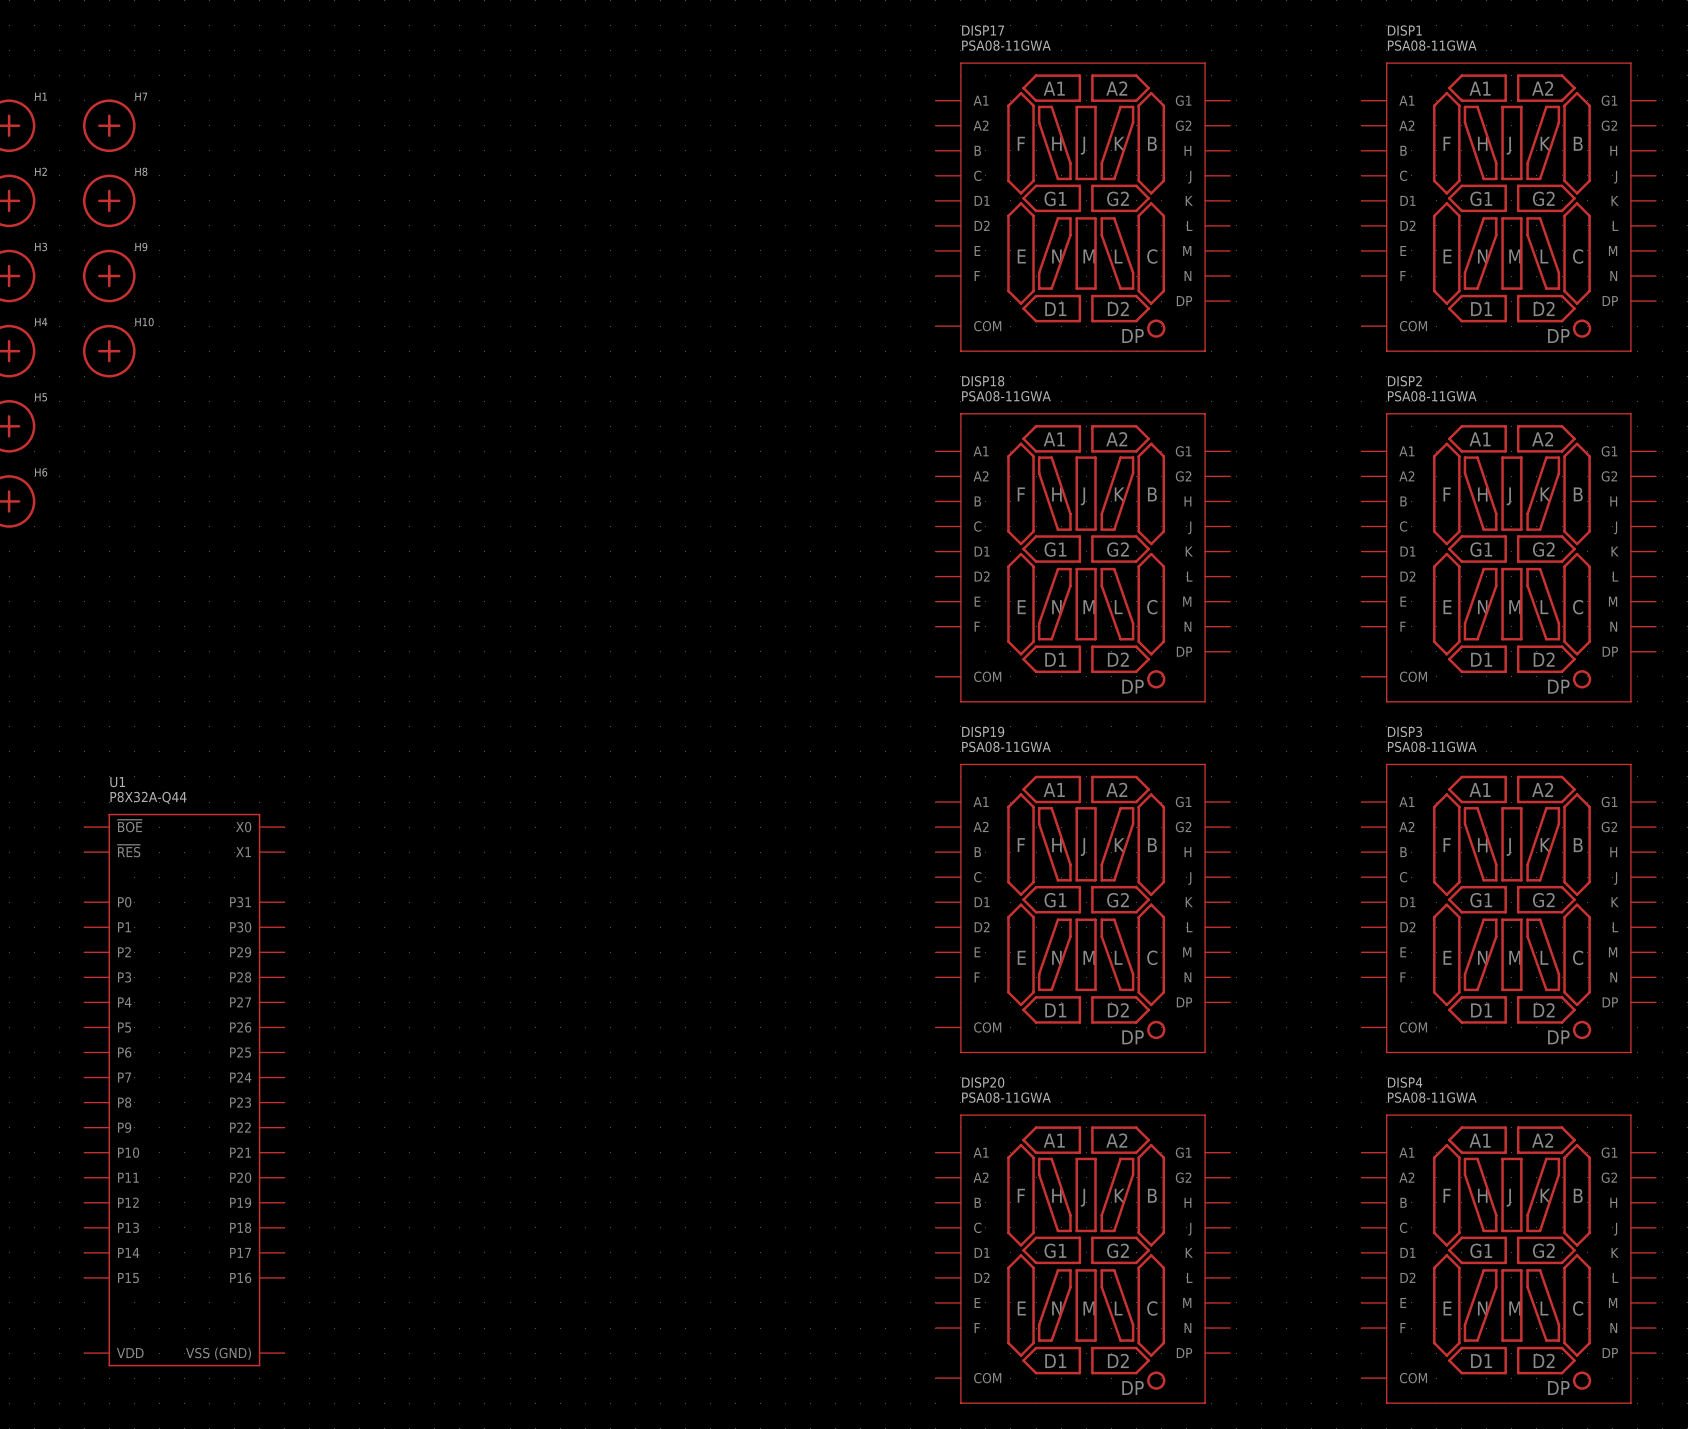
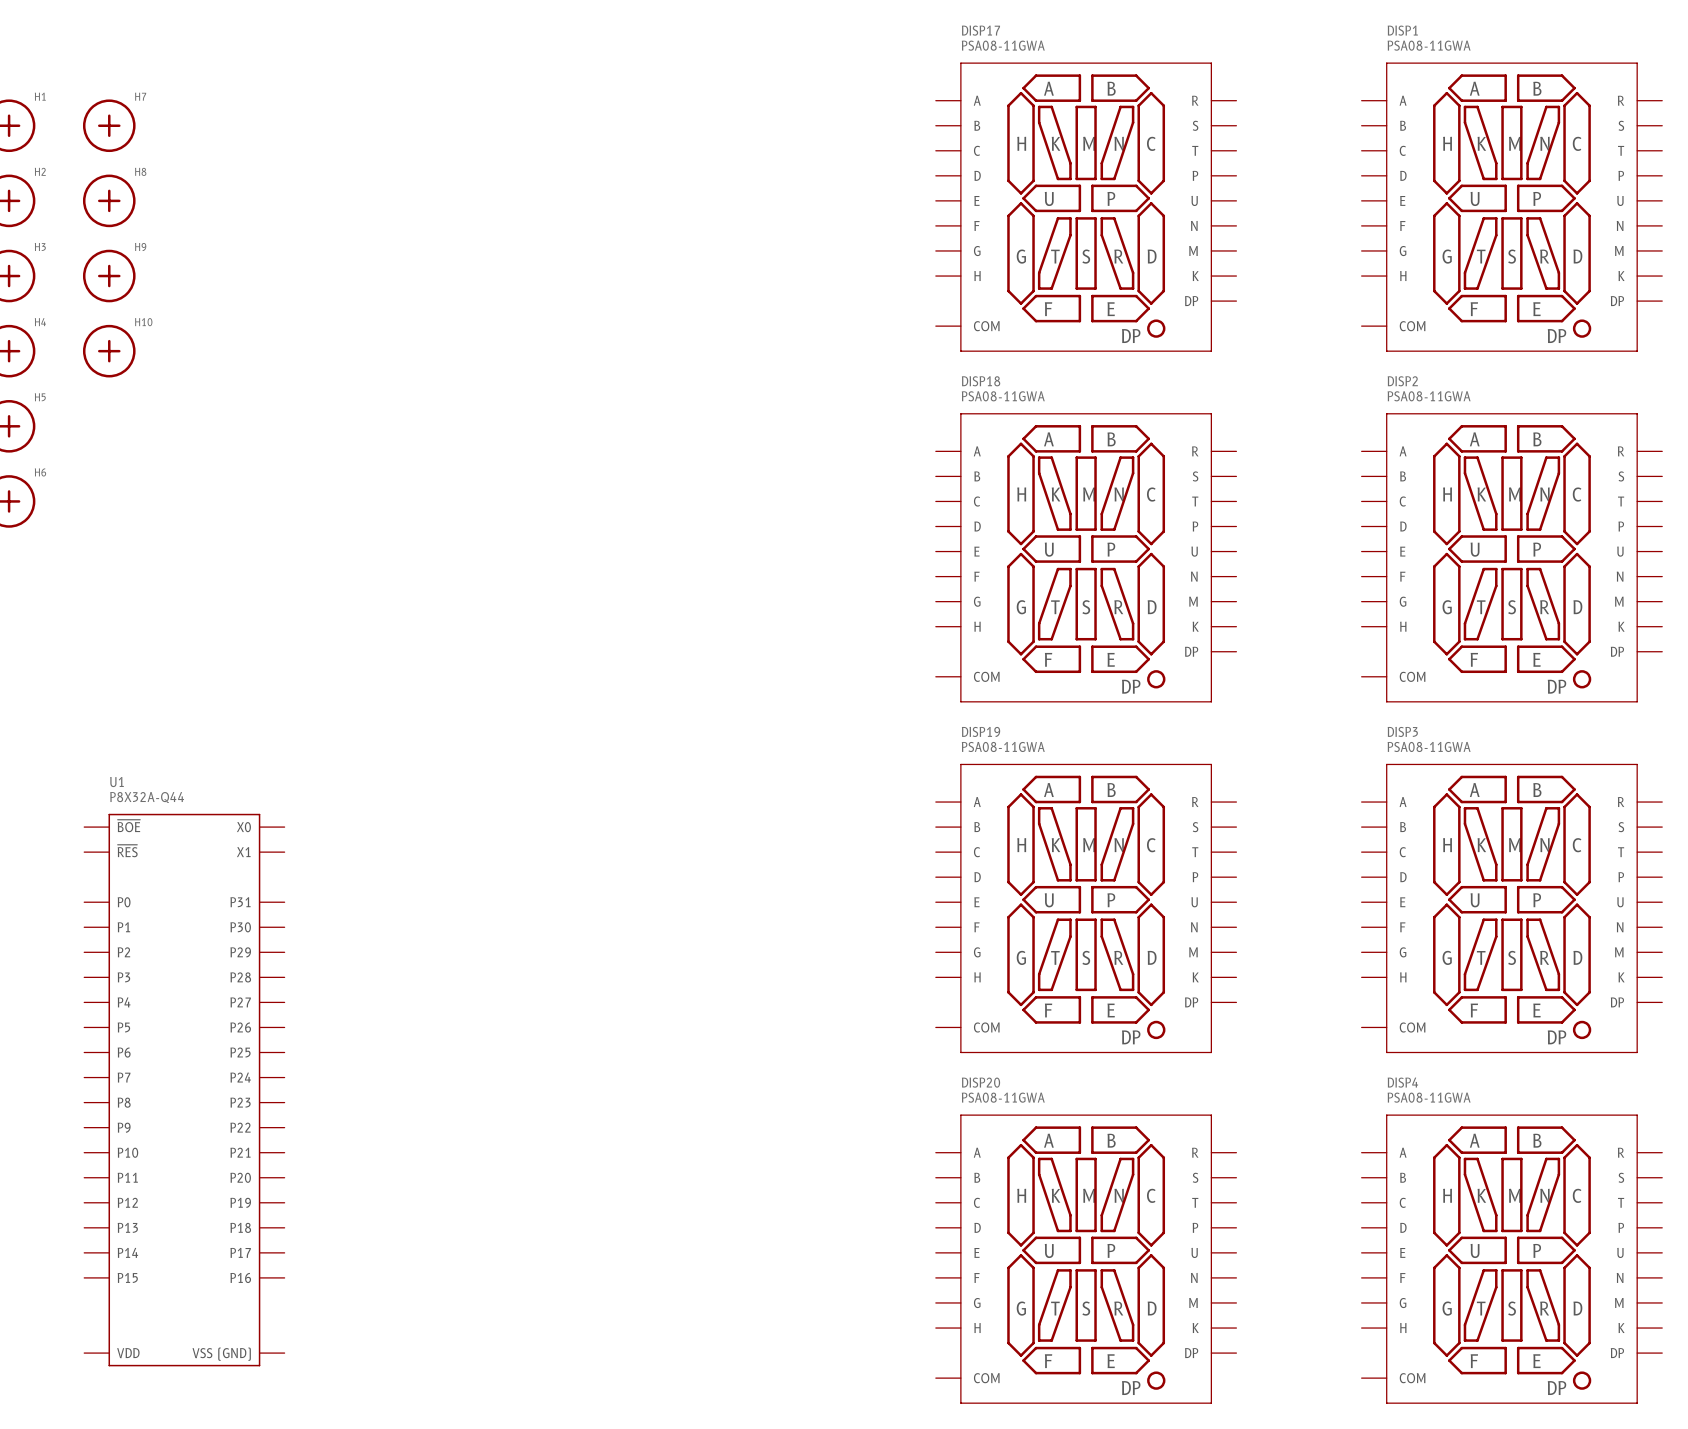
DISP17 symbol: [935, 62, 1231, 352] -> [935, 62, 1237, 352]
DISP1 symbol: [1361, 62, 1656, 352] -> [1361, 62, 1663, 352]
DISP18 symbol: [935, 413, 1231, 703] -> [935, 413, 1237, 703]
DISP2 symbol: [1361, 413, 1656, 703] -> [1361, 413, 1663, 703]
DISP19 symbol: [935, 763, 1231, 1054] -> [935, 763, 1237, 1054]
DISP3 symbol: [1361, 763, 1656, 1054] -> [1361, 763, 1663, 1054]
DISP20 symbol: [935, 1114, 1231, 1404] -> [935, 1114, 1237, 1404]
DISP4 symbol: [1361, 1114, 1656, 1404] -> [1361, 1114, 1663, 1404]

